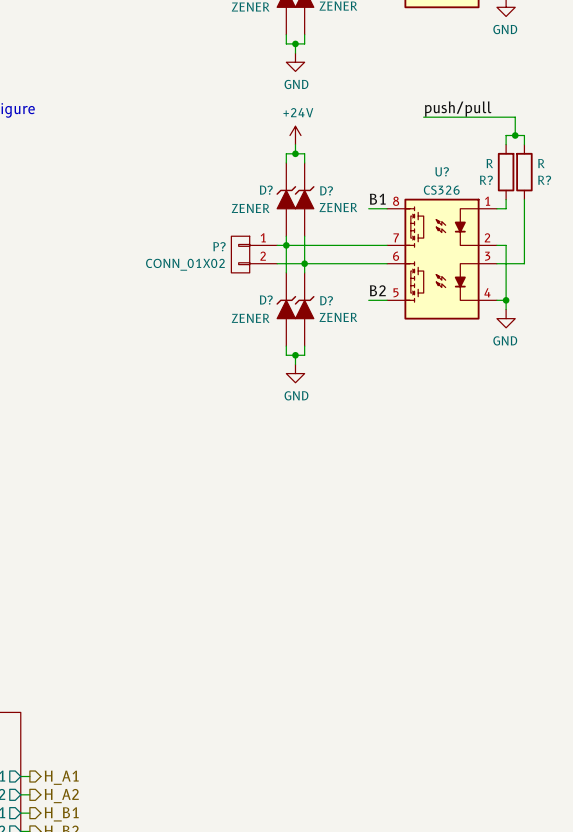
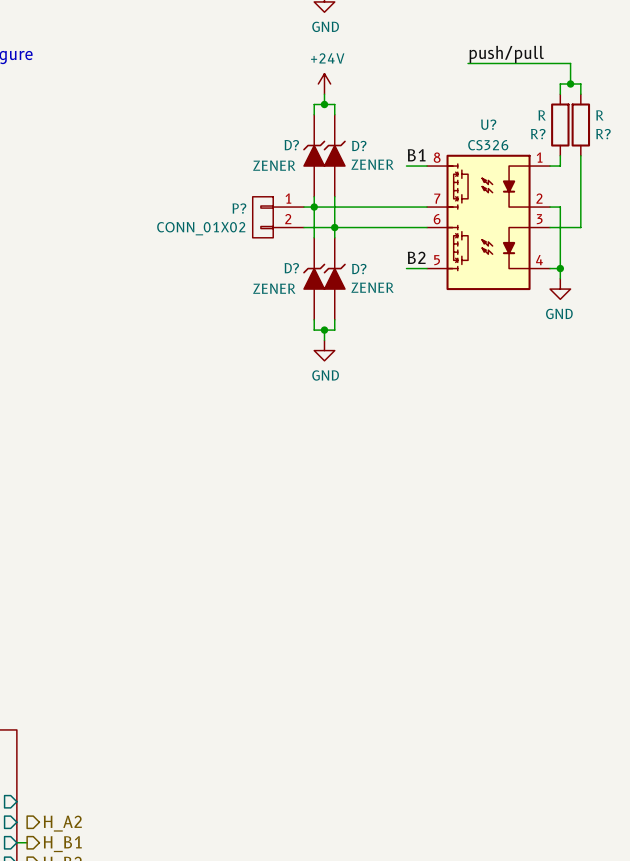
wire: (20, 776) (29, 776) -> none
hierarchical label: H_A1 (61, 777) -> none
wire: (20, 794) (29, 794) -> none

